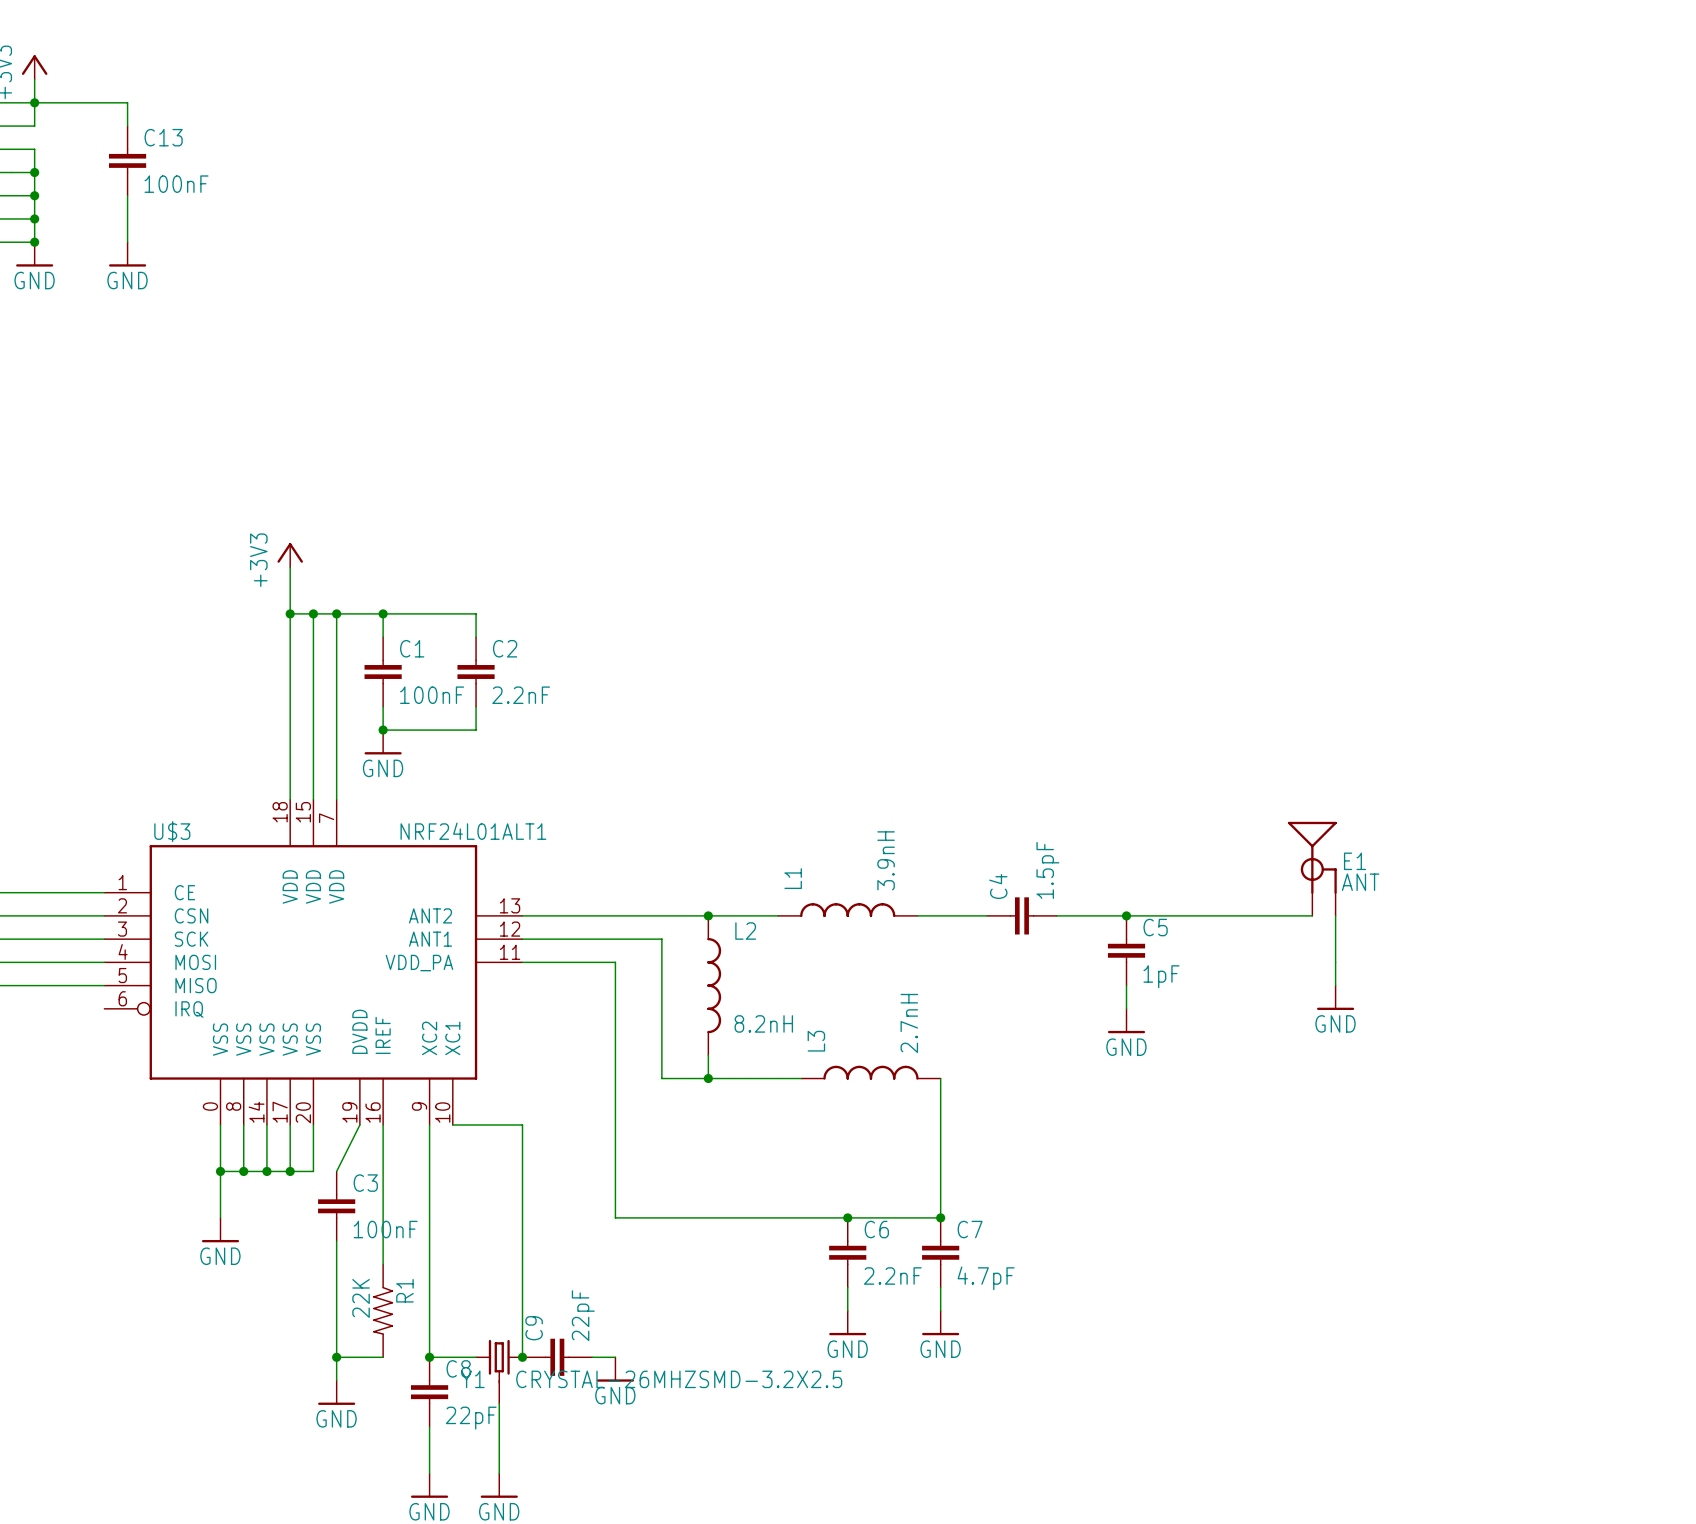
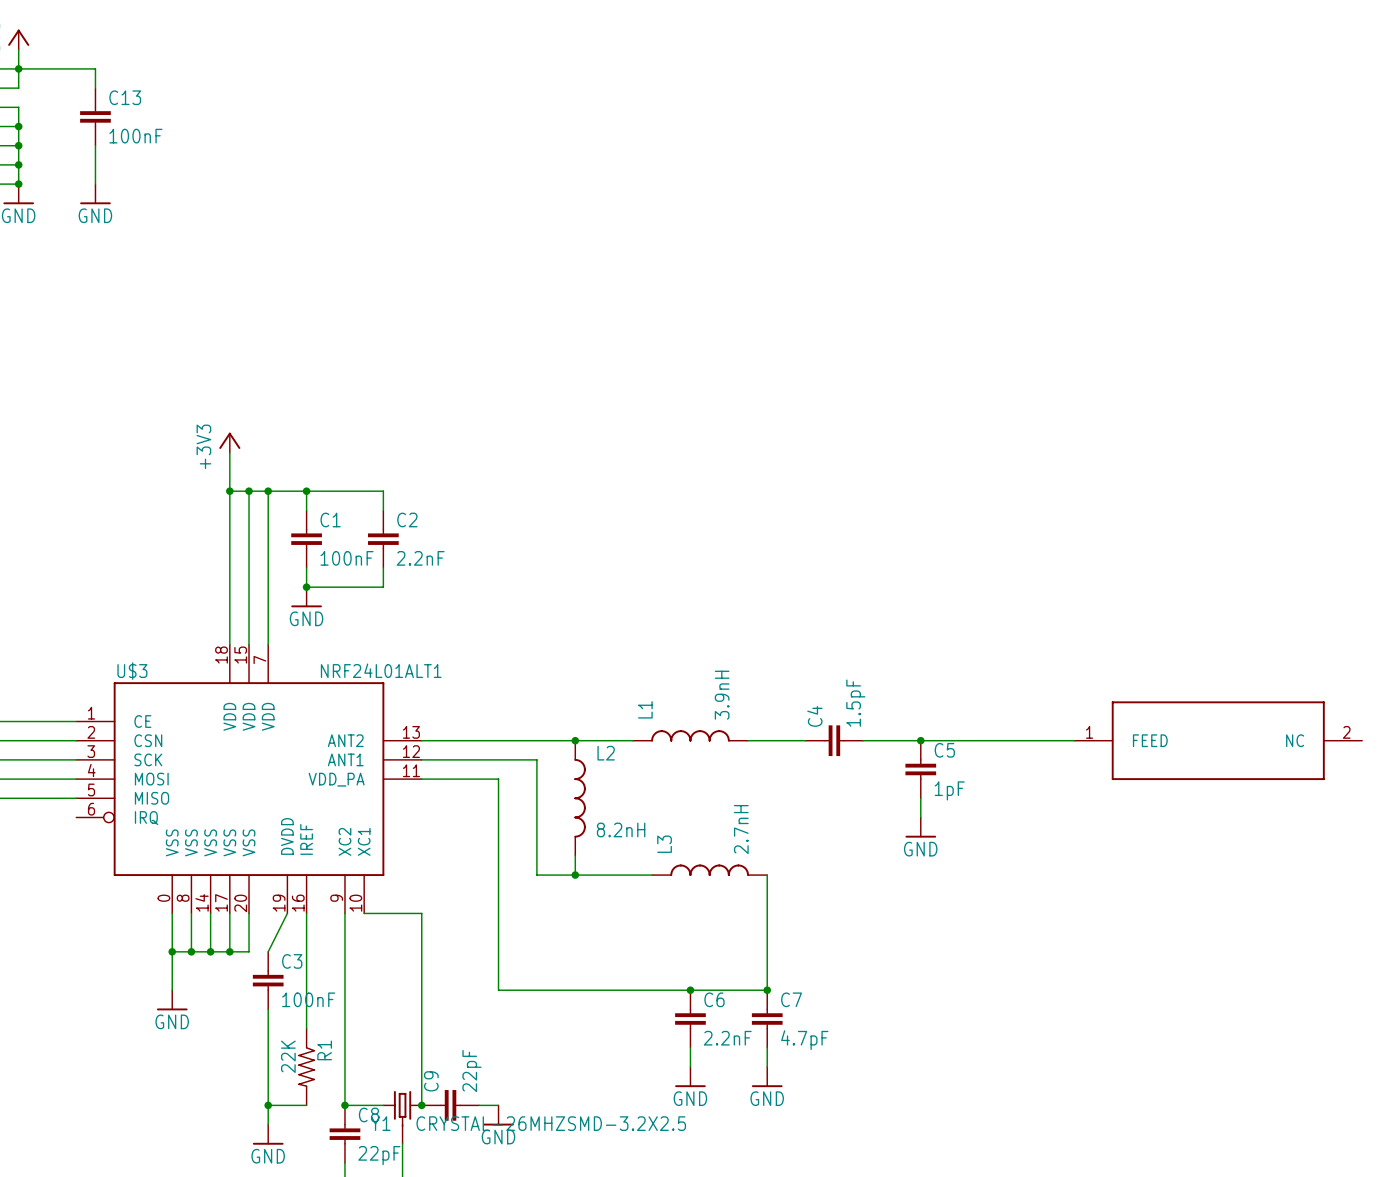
E1: ANT (1312, 868) -> none
wire: (1335, 915) (1335, 985) -> none
part: none -> (1218, 740)
power symbol: GND (1335, 997) -> none

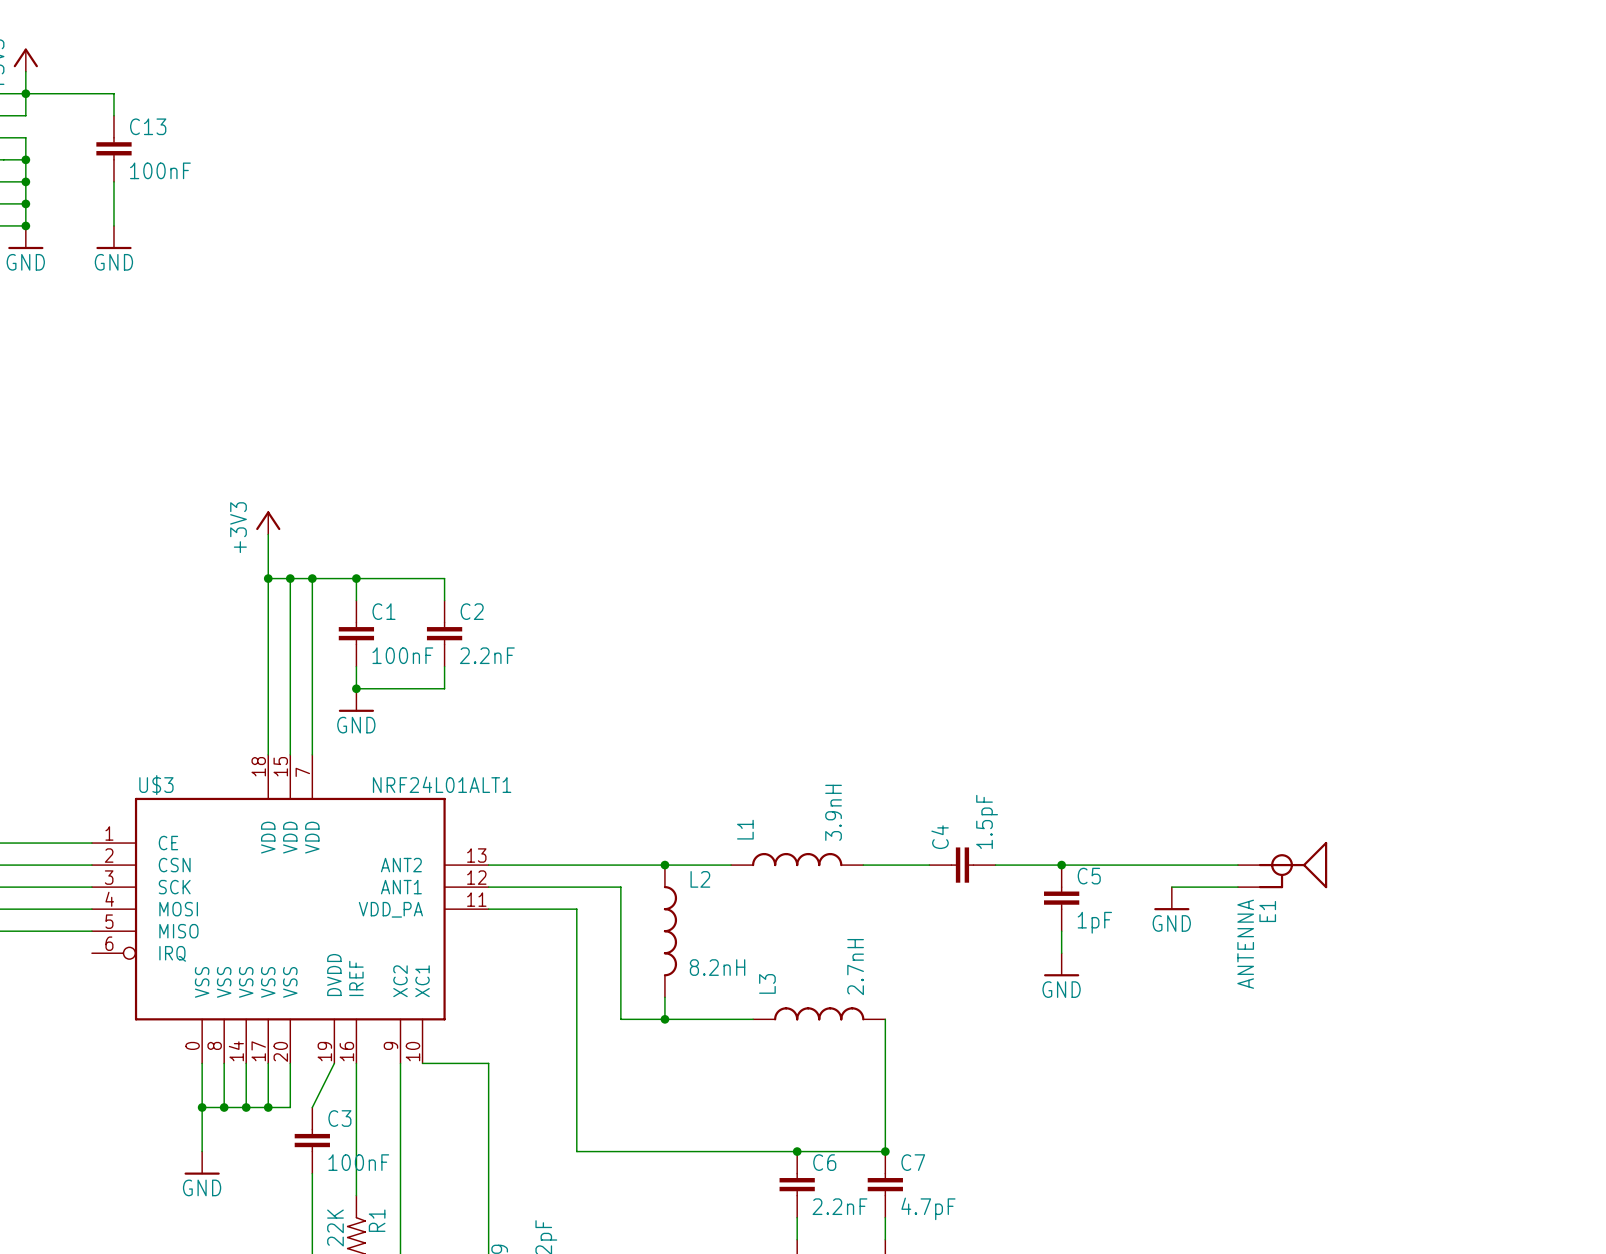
E1: none -> ANTENNA (1282, 865)
part: (1218, 740) -> none
wire: none -> (1171, 887) (1237, 887)
power symbol: none -> GND (1171, 898)

